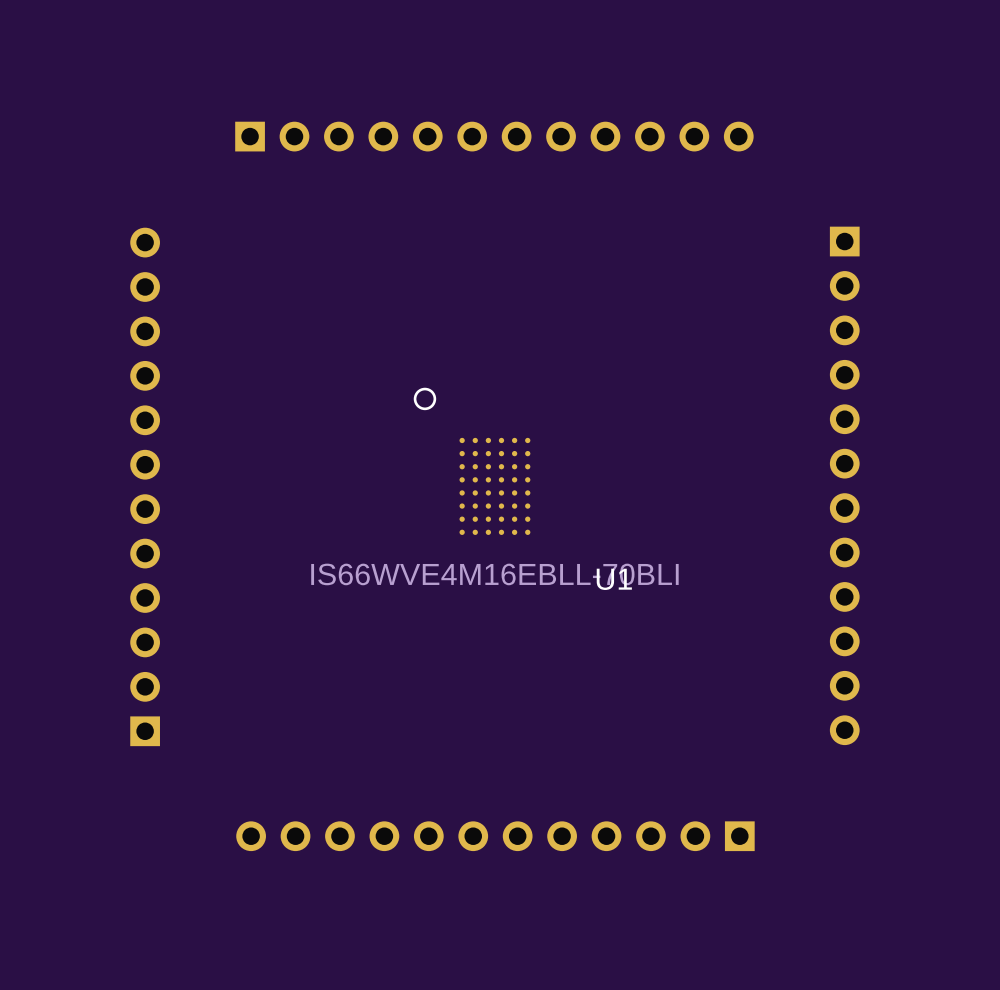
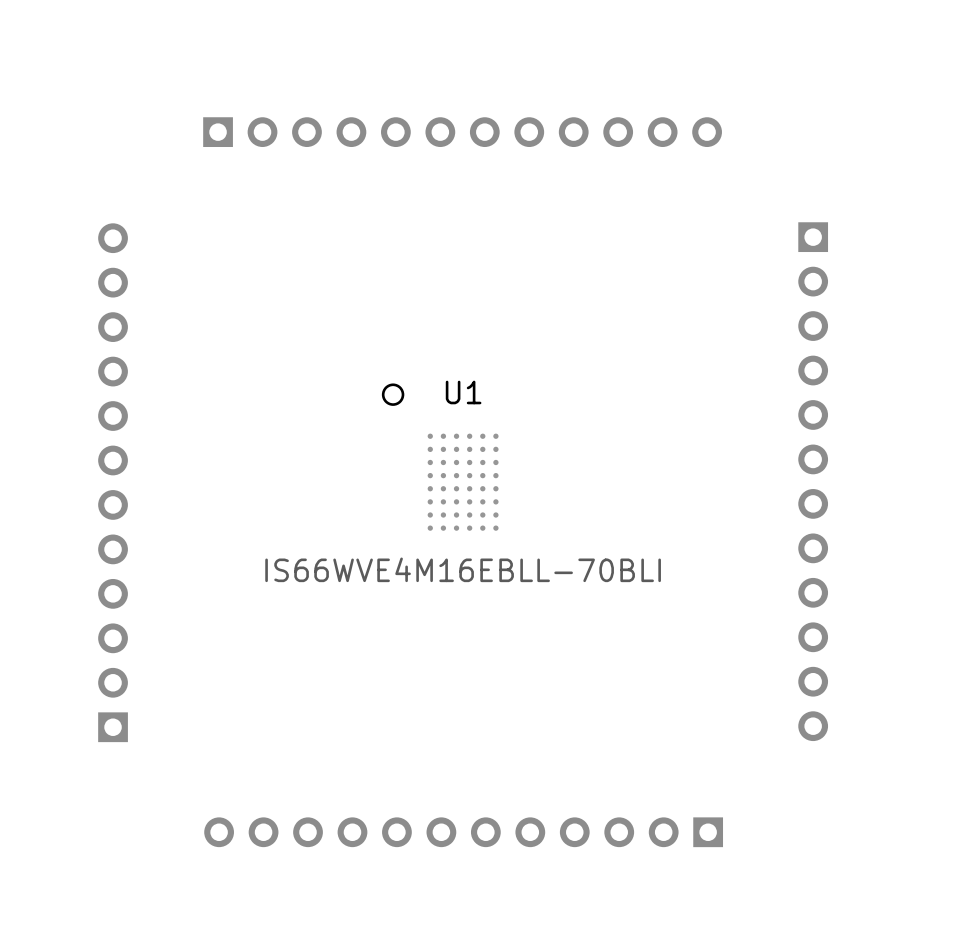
U1 name position: U1 (614, 579) -> U1 (463, 392)

